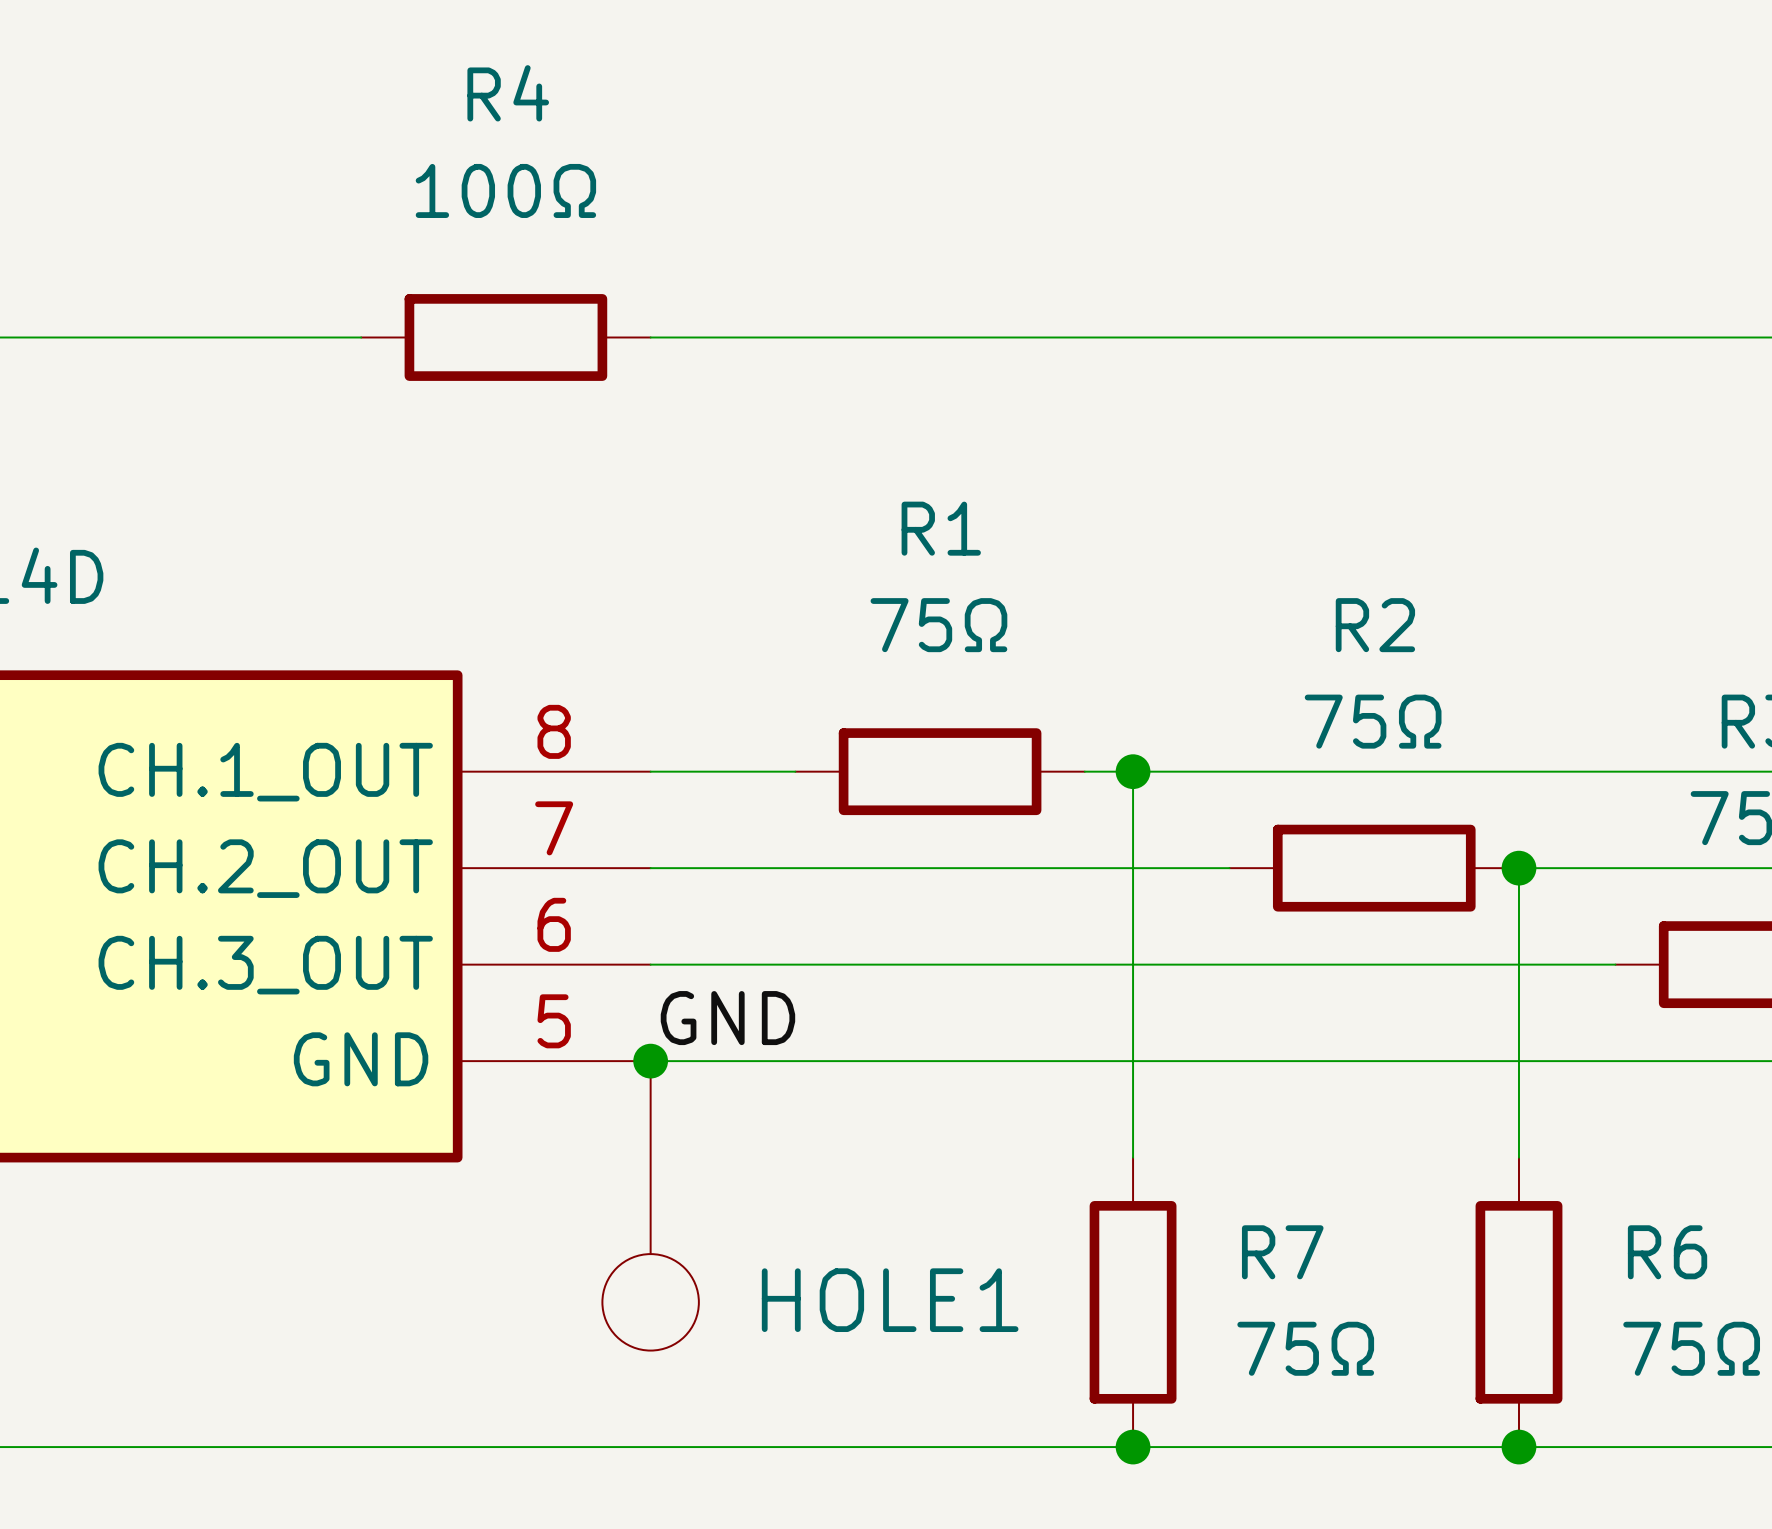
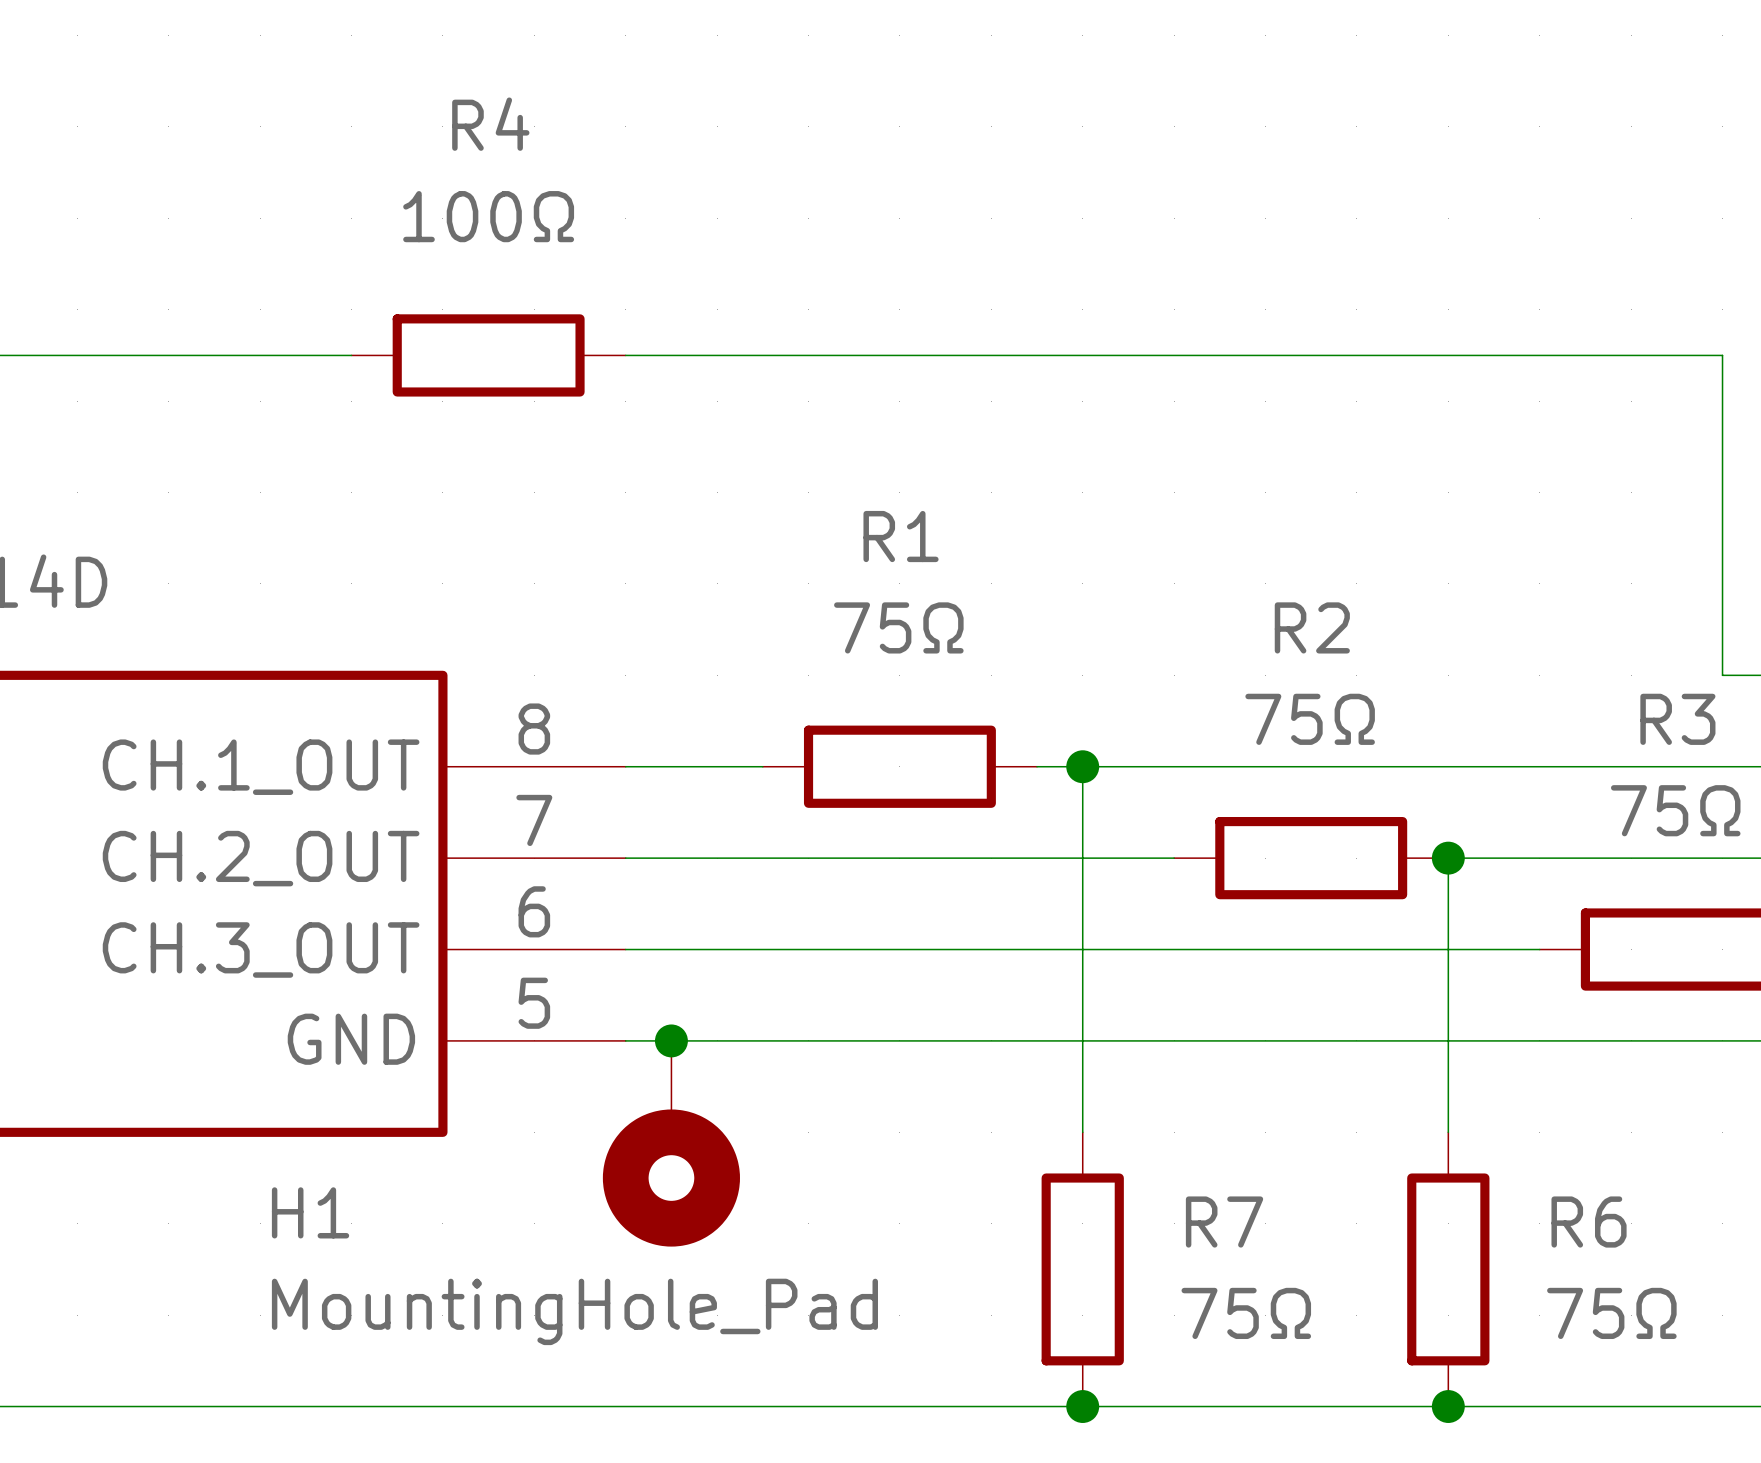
label: GND (727, 1018) -> none
junction position: (650, 1061) -> (671, 1040)
H1: none -> MountingHole_Pad (671, 1143)
HOLE1: (650, 1205) -> none

